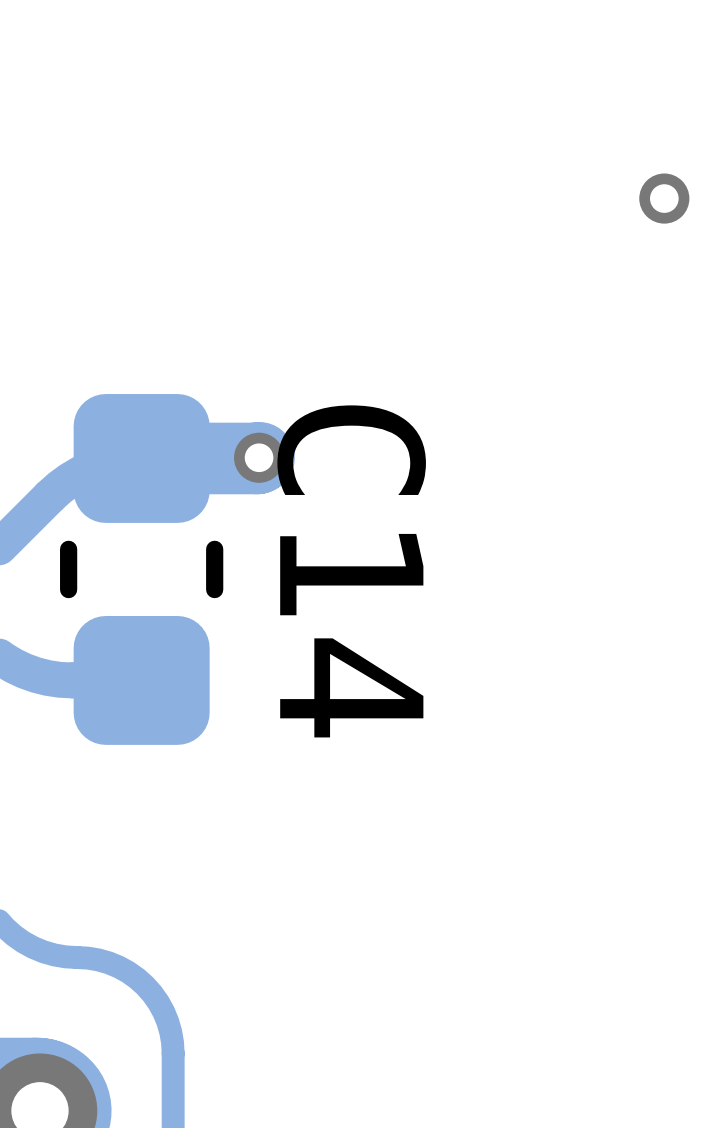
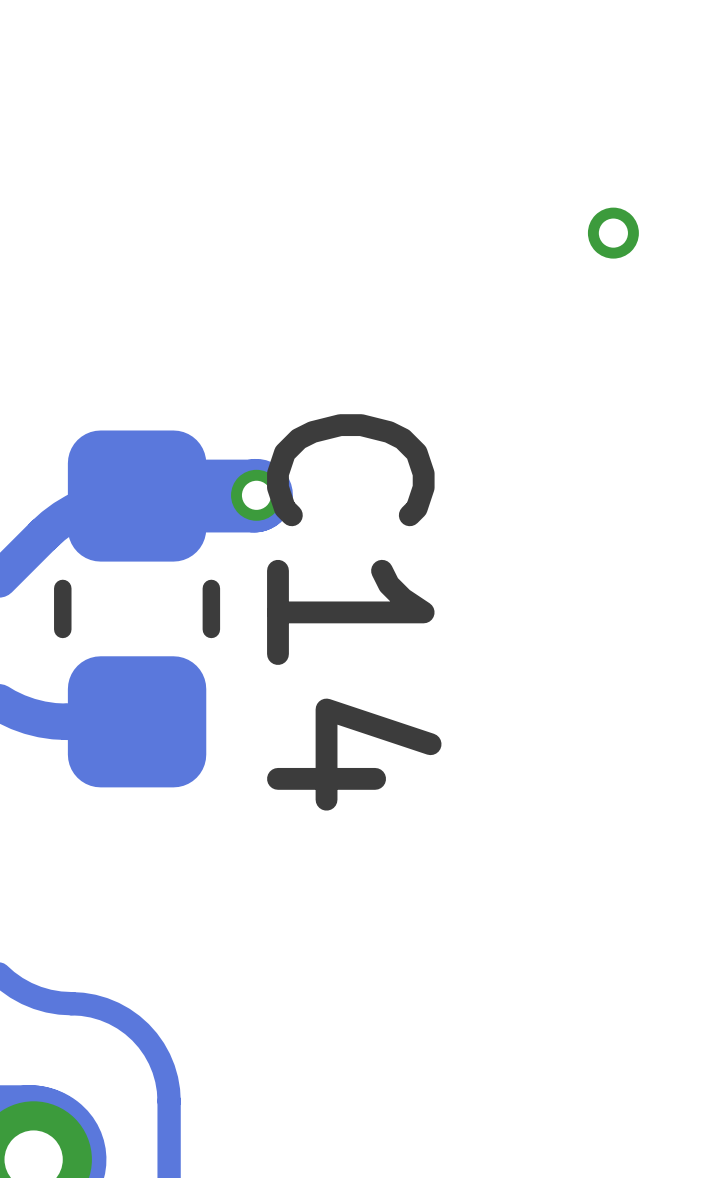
via position: (664, 198) -> (613, 233)

